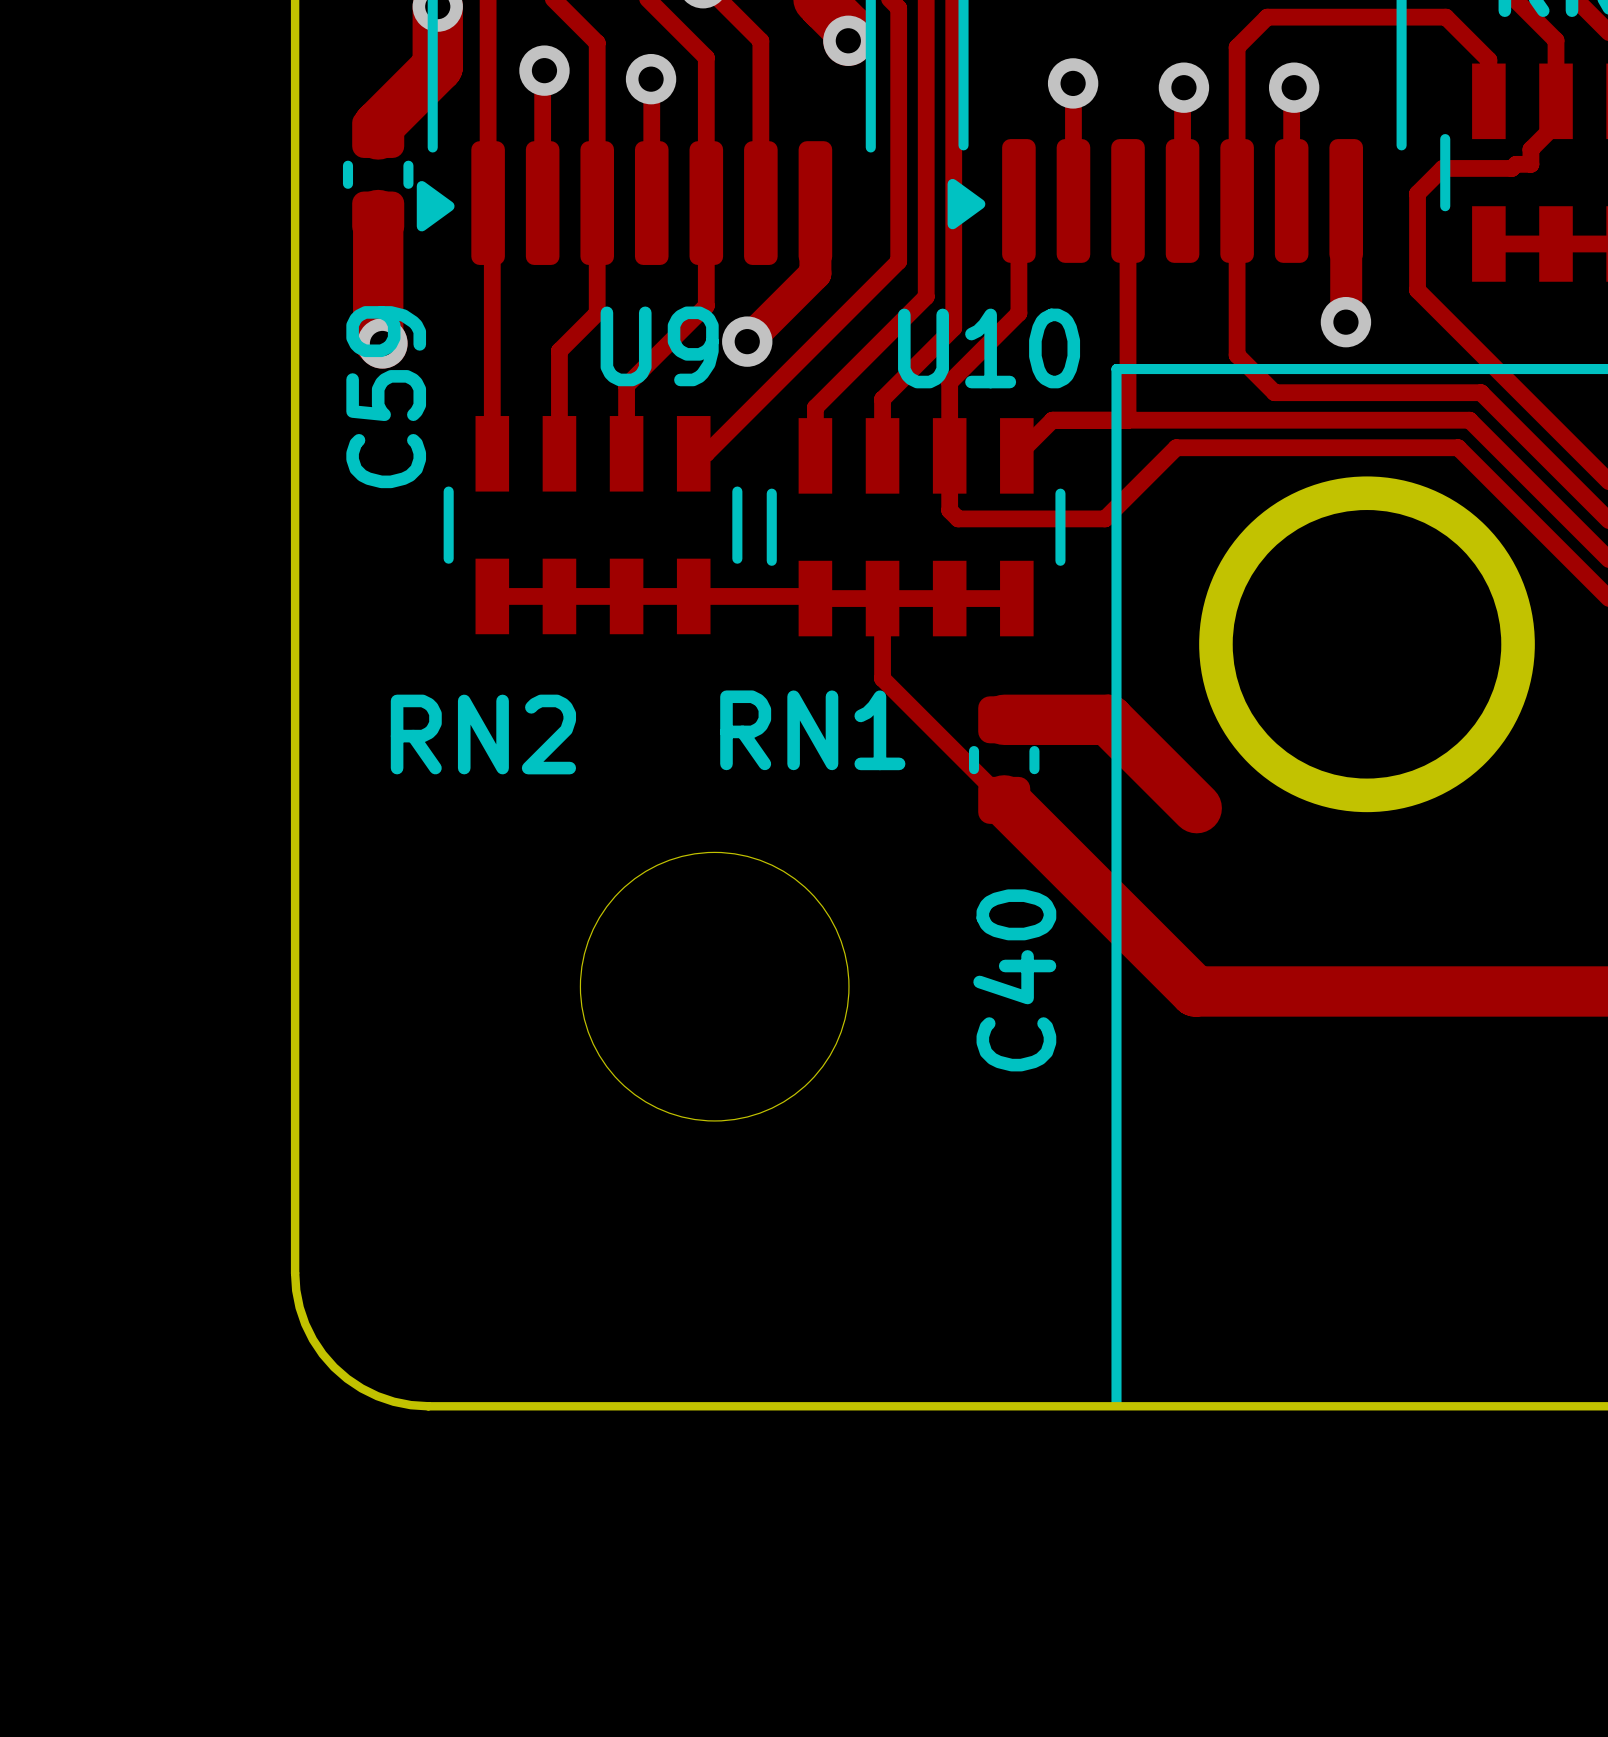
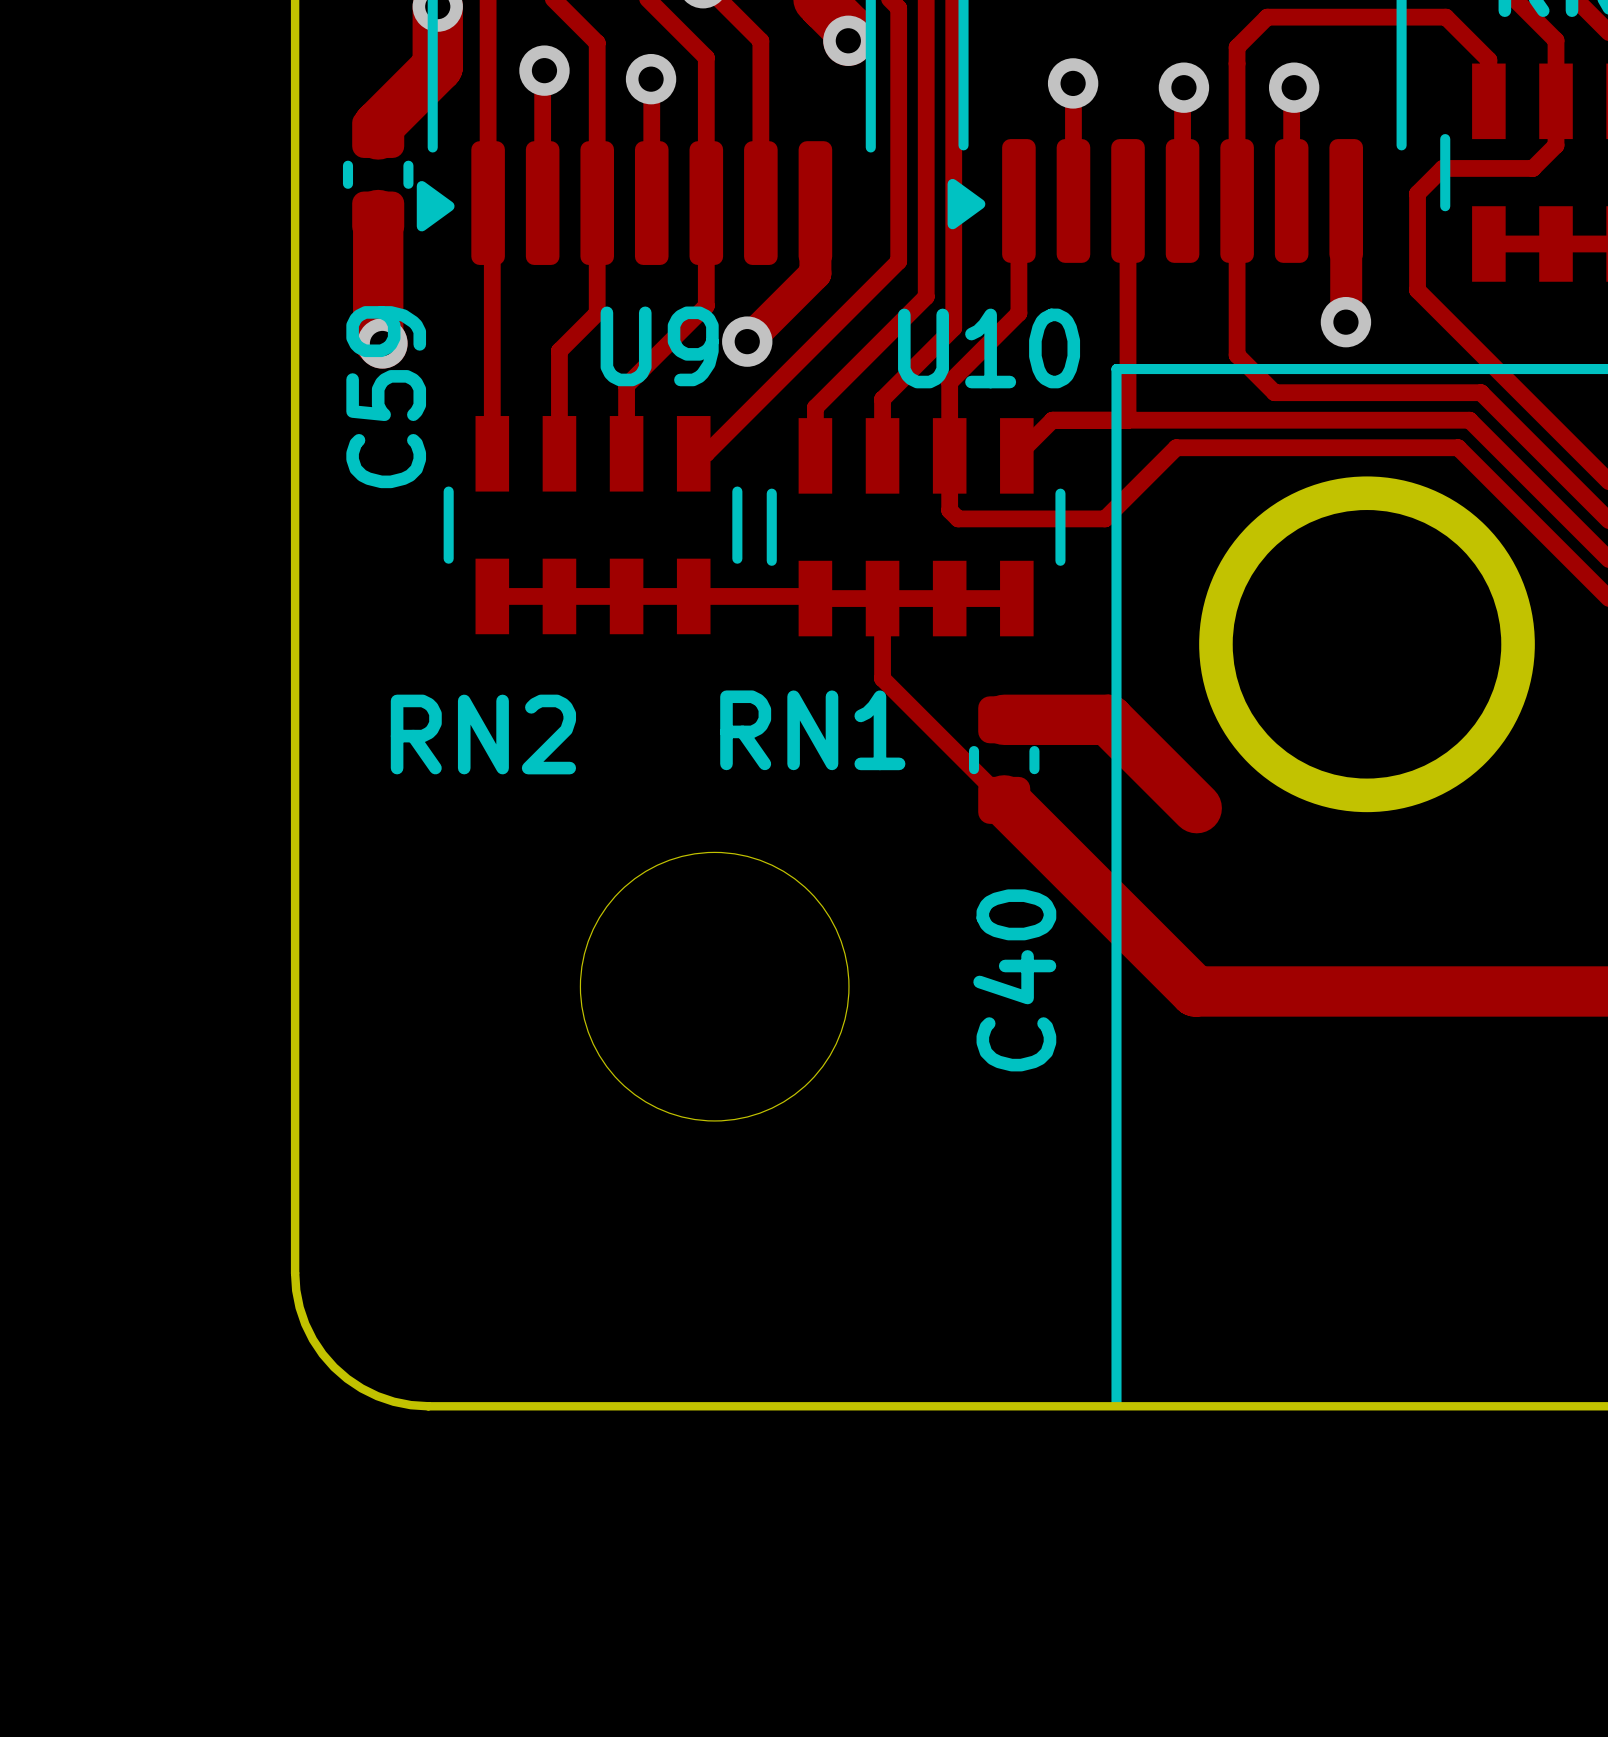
track: (1556, 124) (1530, 149) (1530, 164) (1516, 164) (1511, 168) -> (1556, 124) (1556, 145) (1532, 168) (1511, 168)

